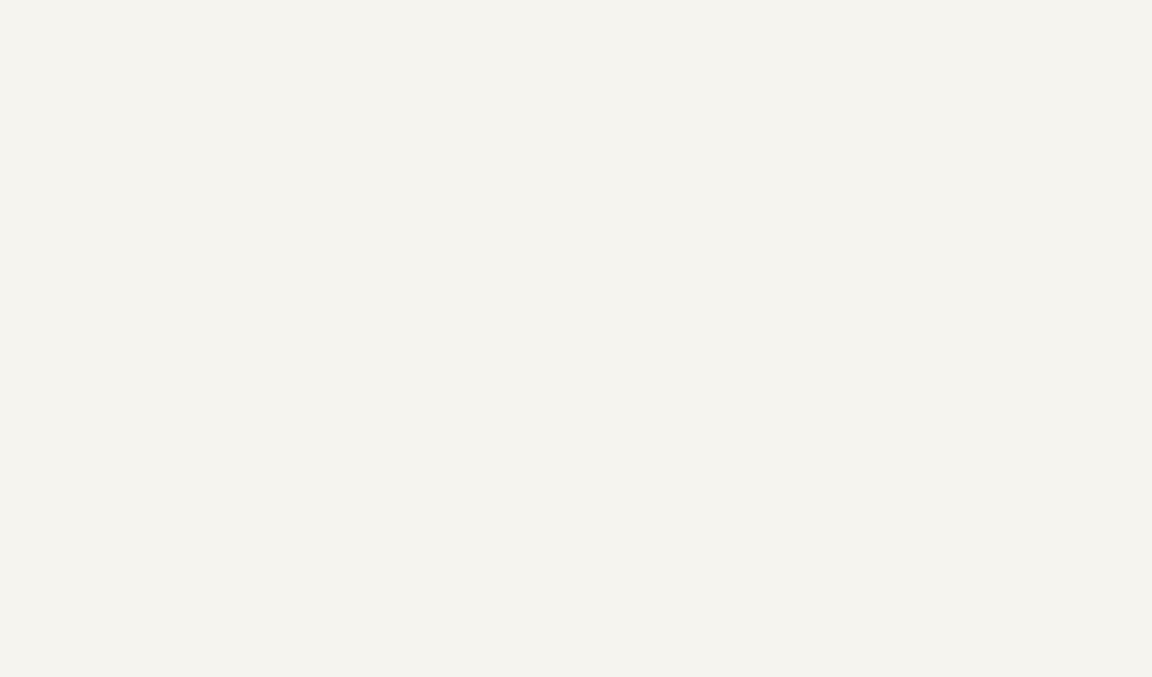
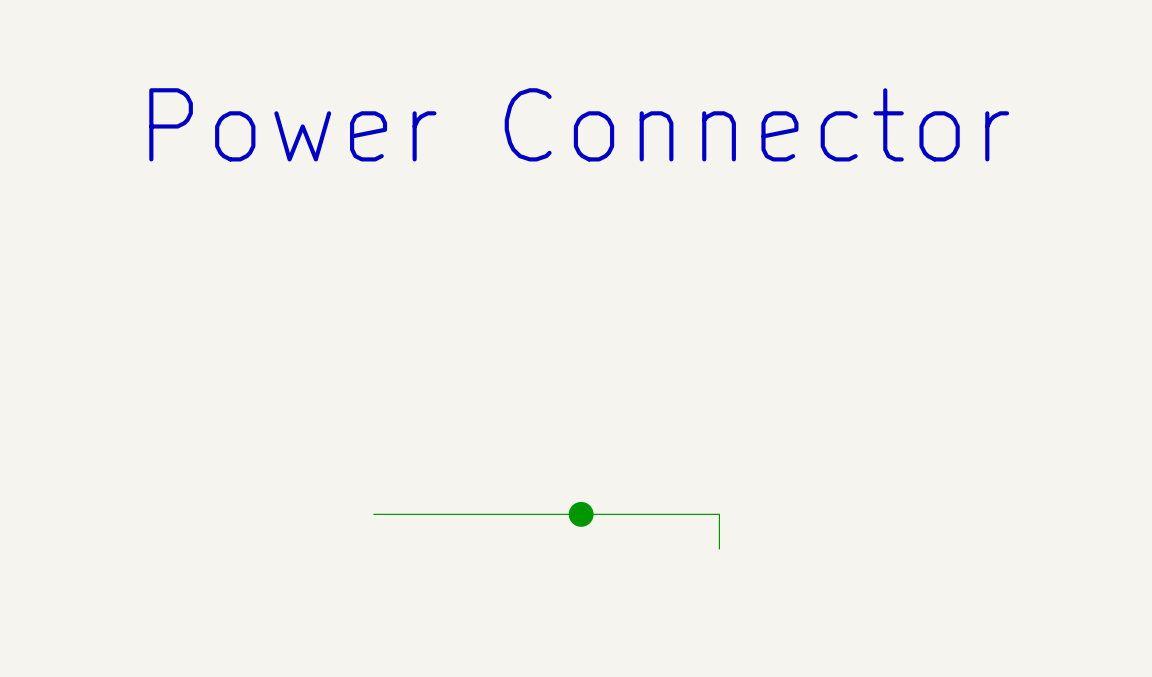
text: none -> Power Connector (579, 124)
wire: none -> (373, 514) (719, 514) (719, 548)
junction: none -> (581, 514)

